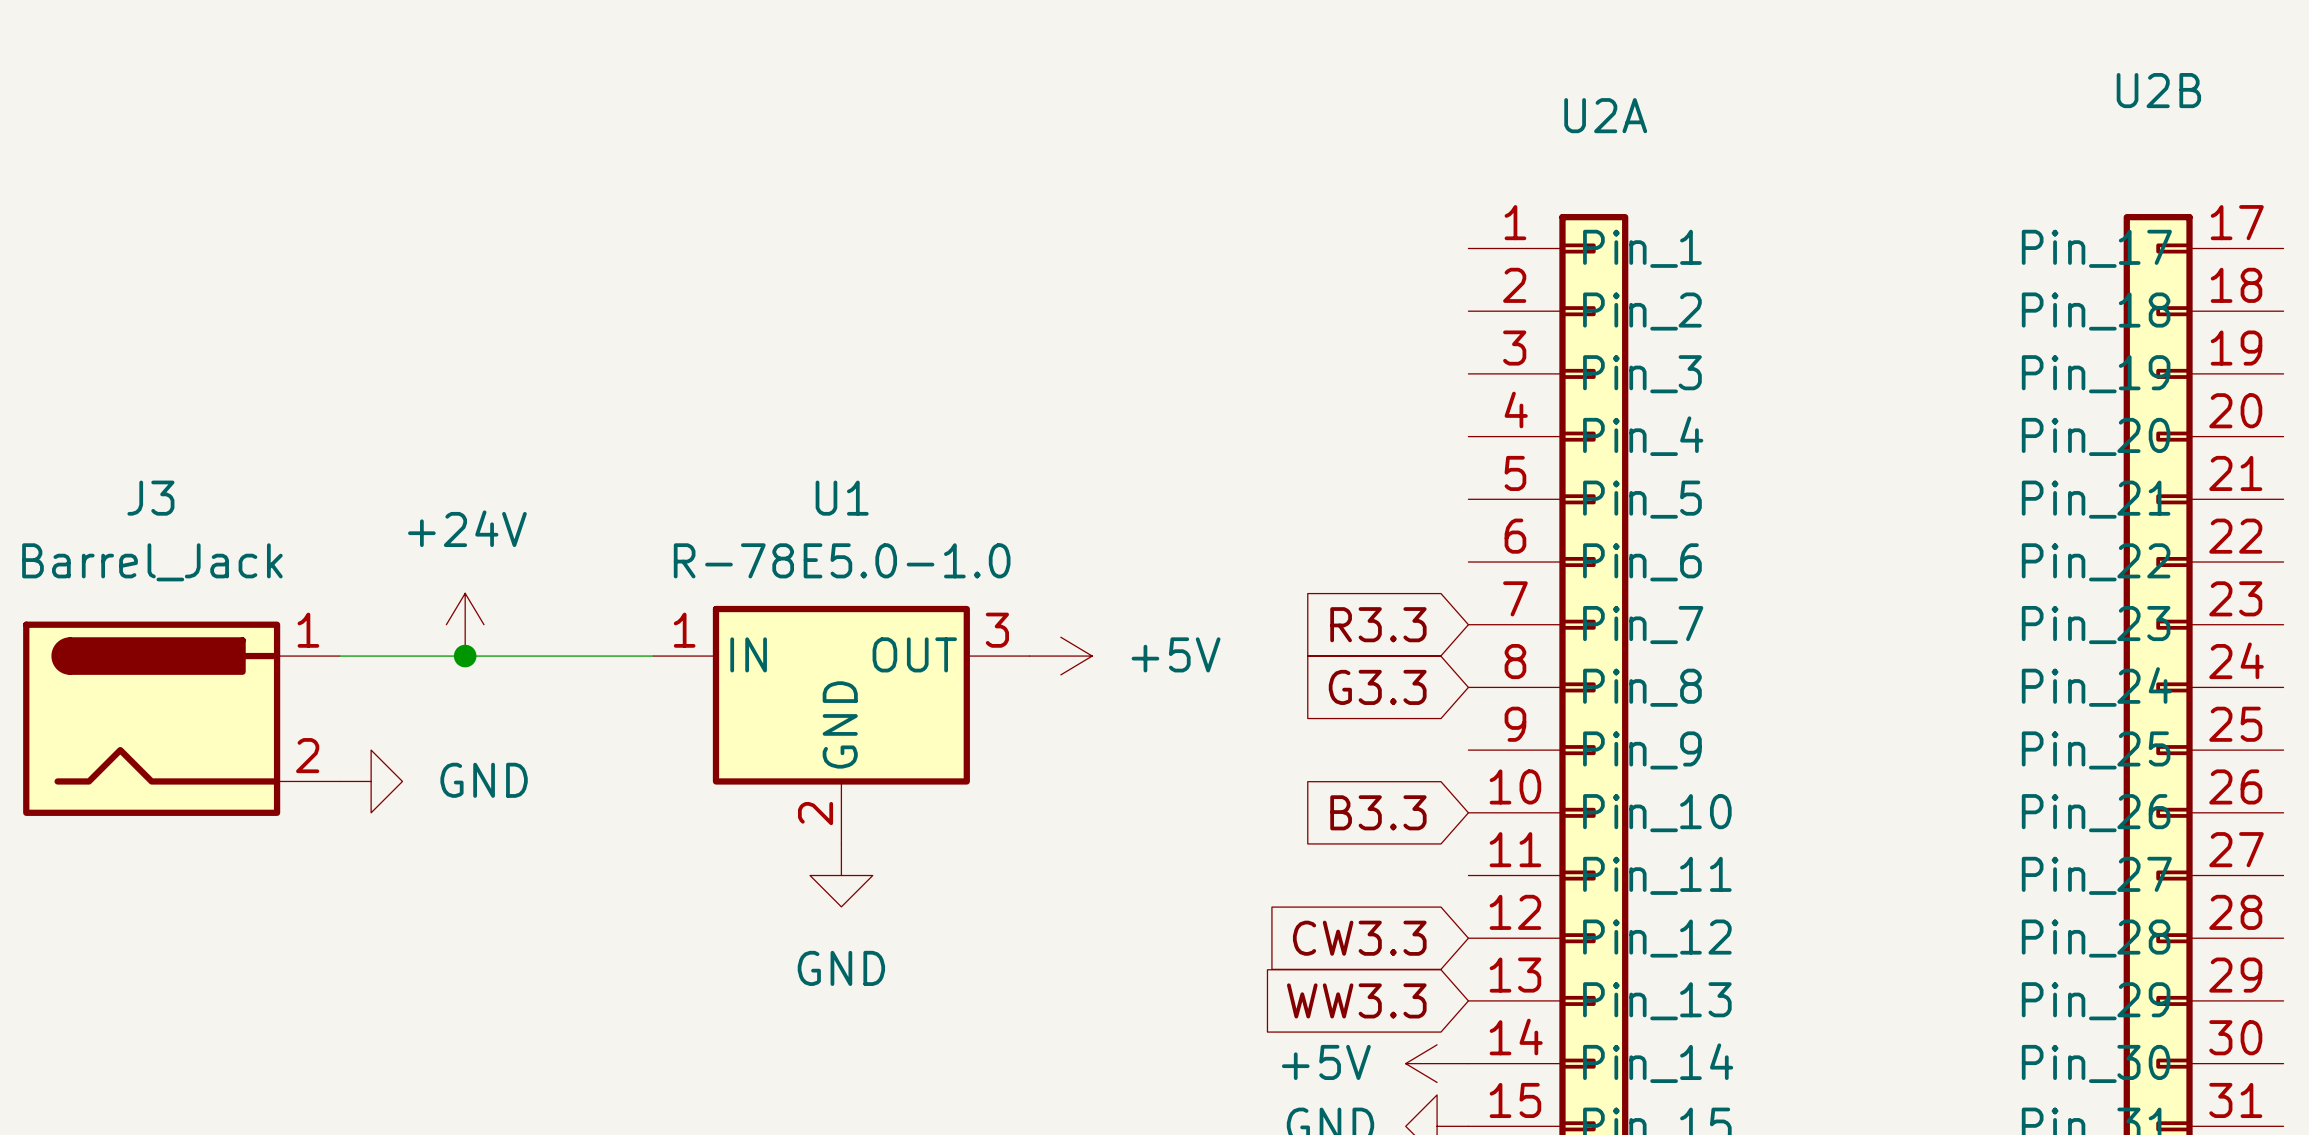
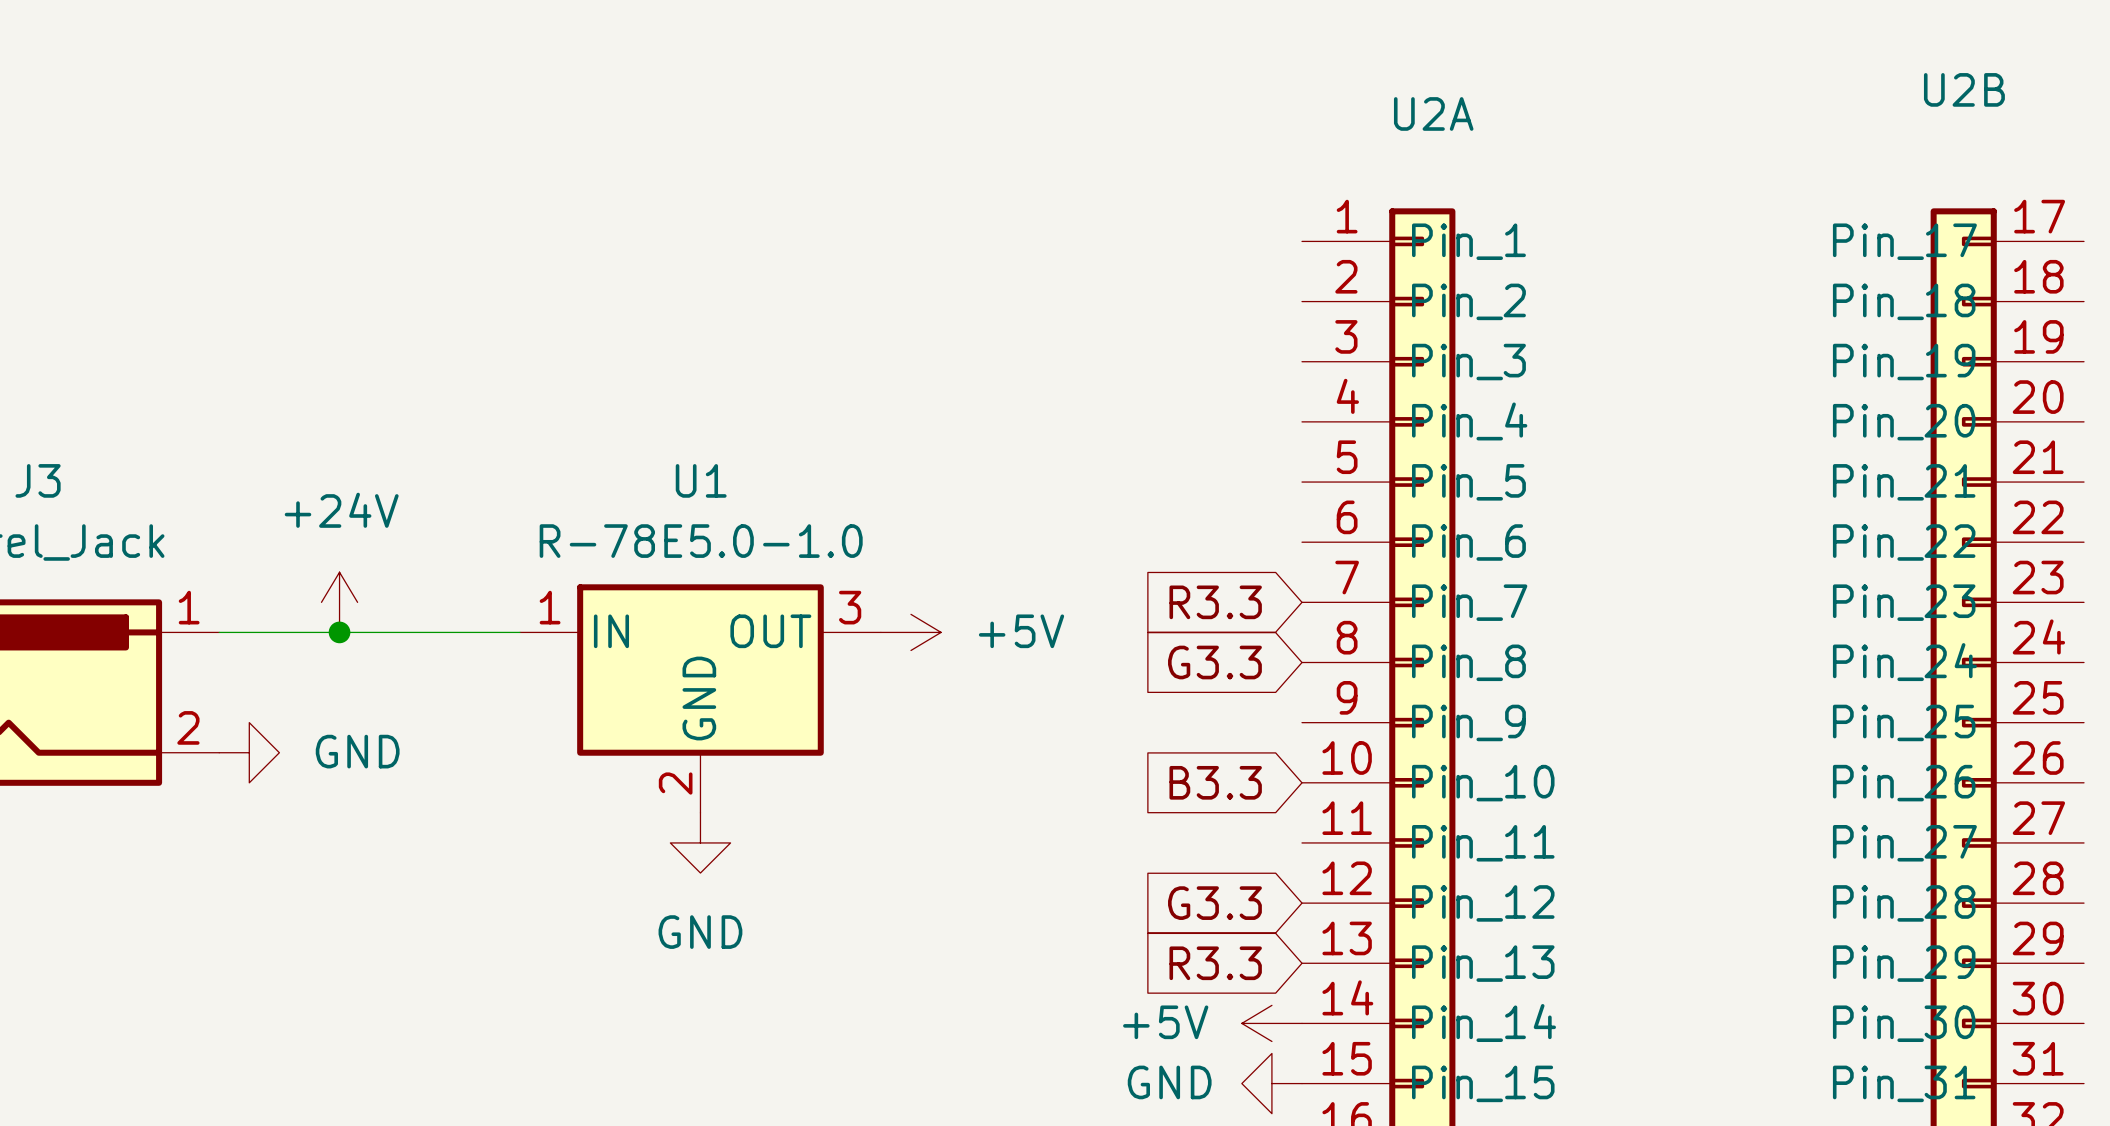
global label: CW3.3 (1359, 938) -> G3.3 (1214, 903)
global label: WW3.3 (1356, 1000) -> R3.3 (1215, 963)

